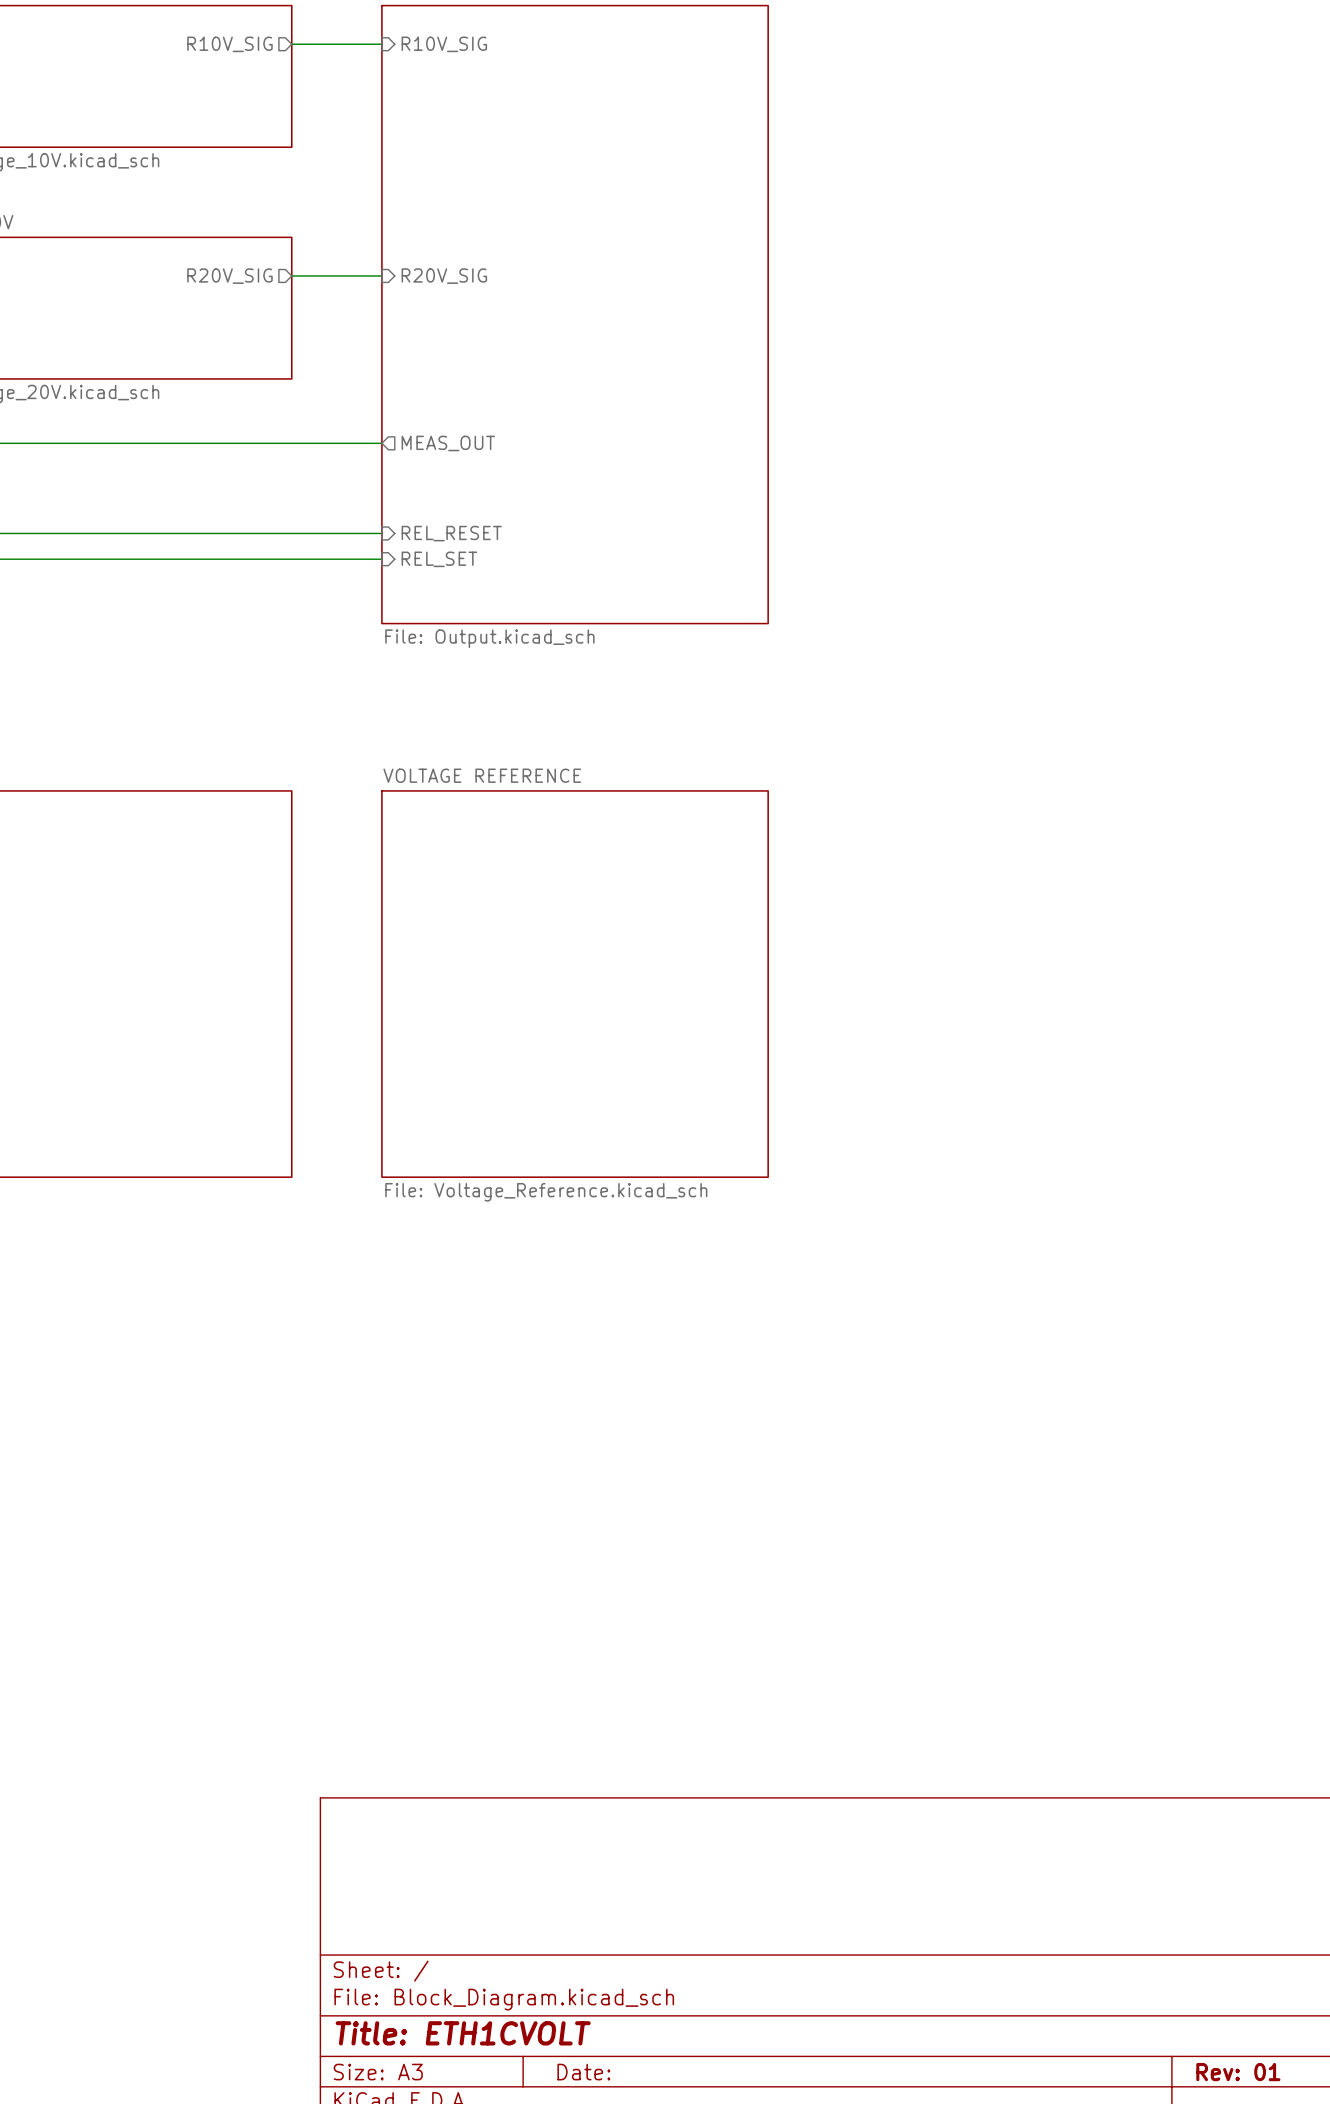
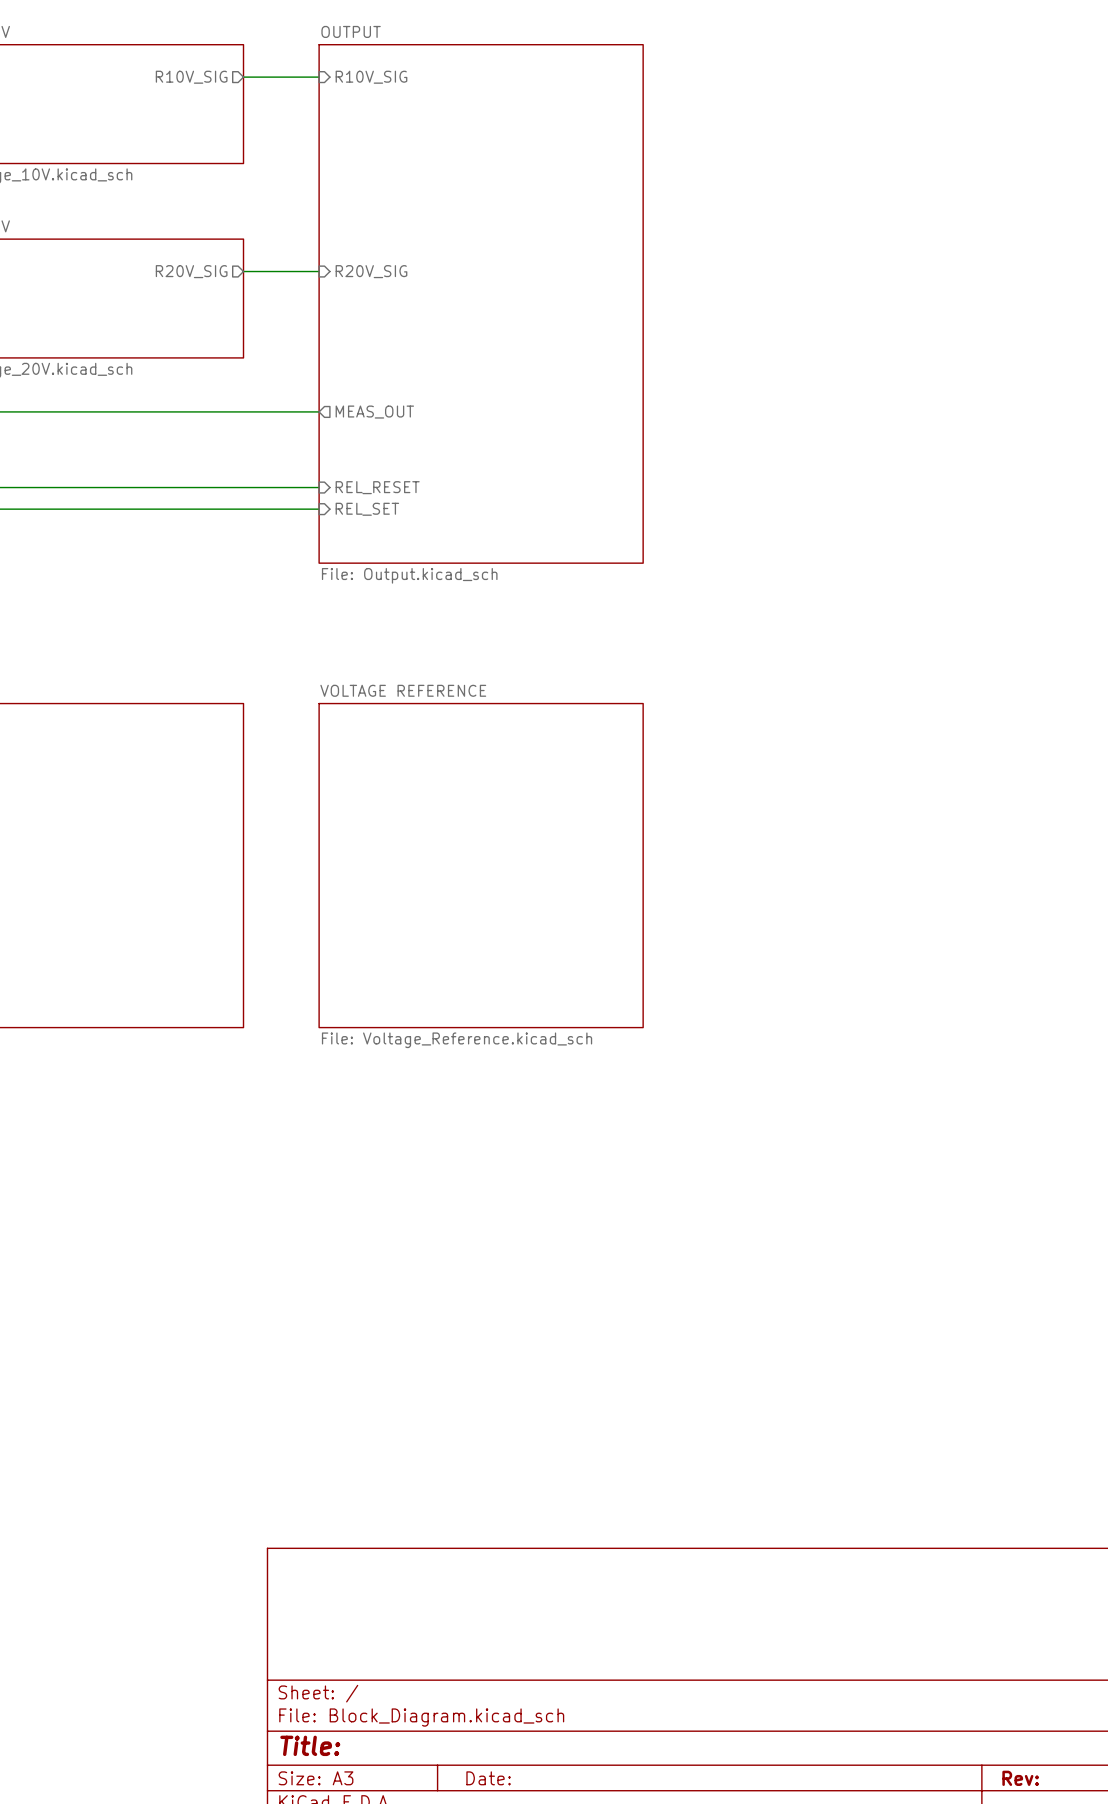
title block: Title: ETH1CVOLT (463, 2033) -> Title: (310, 1745)
title block: Rev: 01 (1238, 2072) -> Rev: (1020, 1778)

